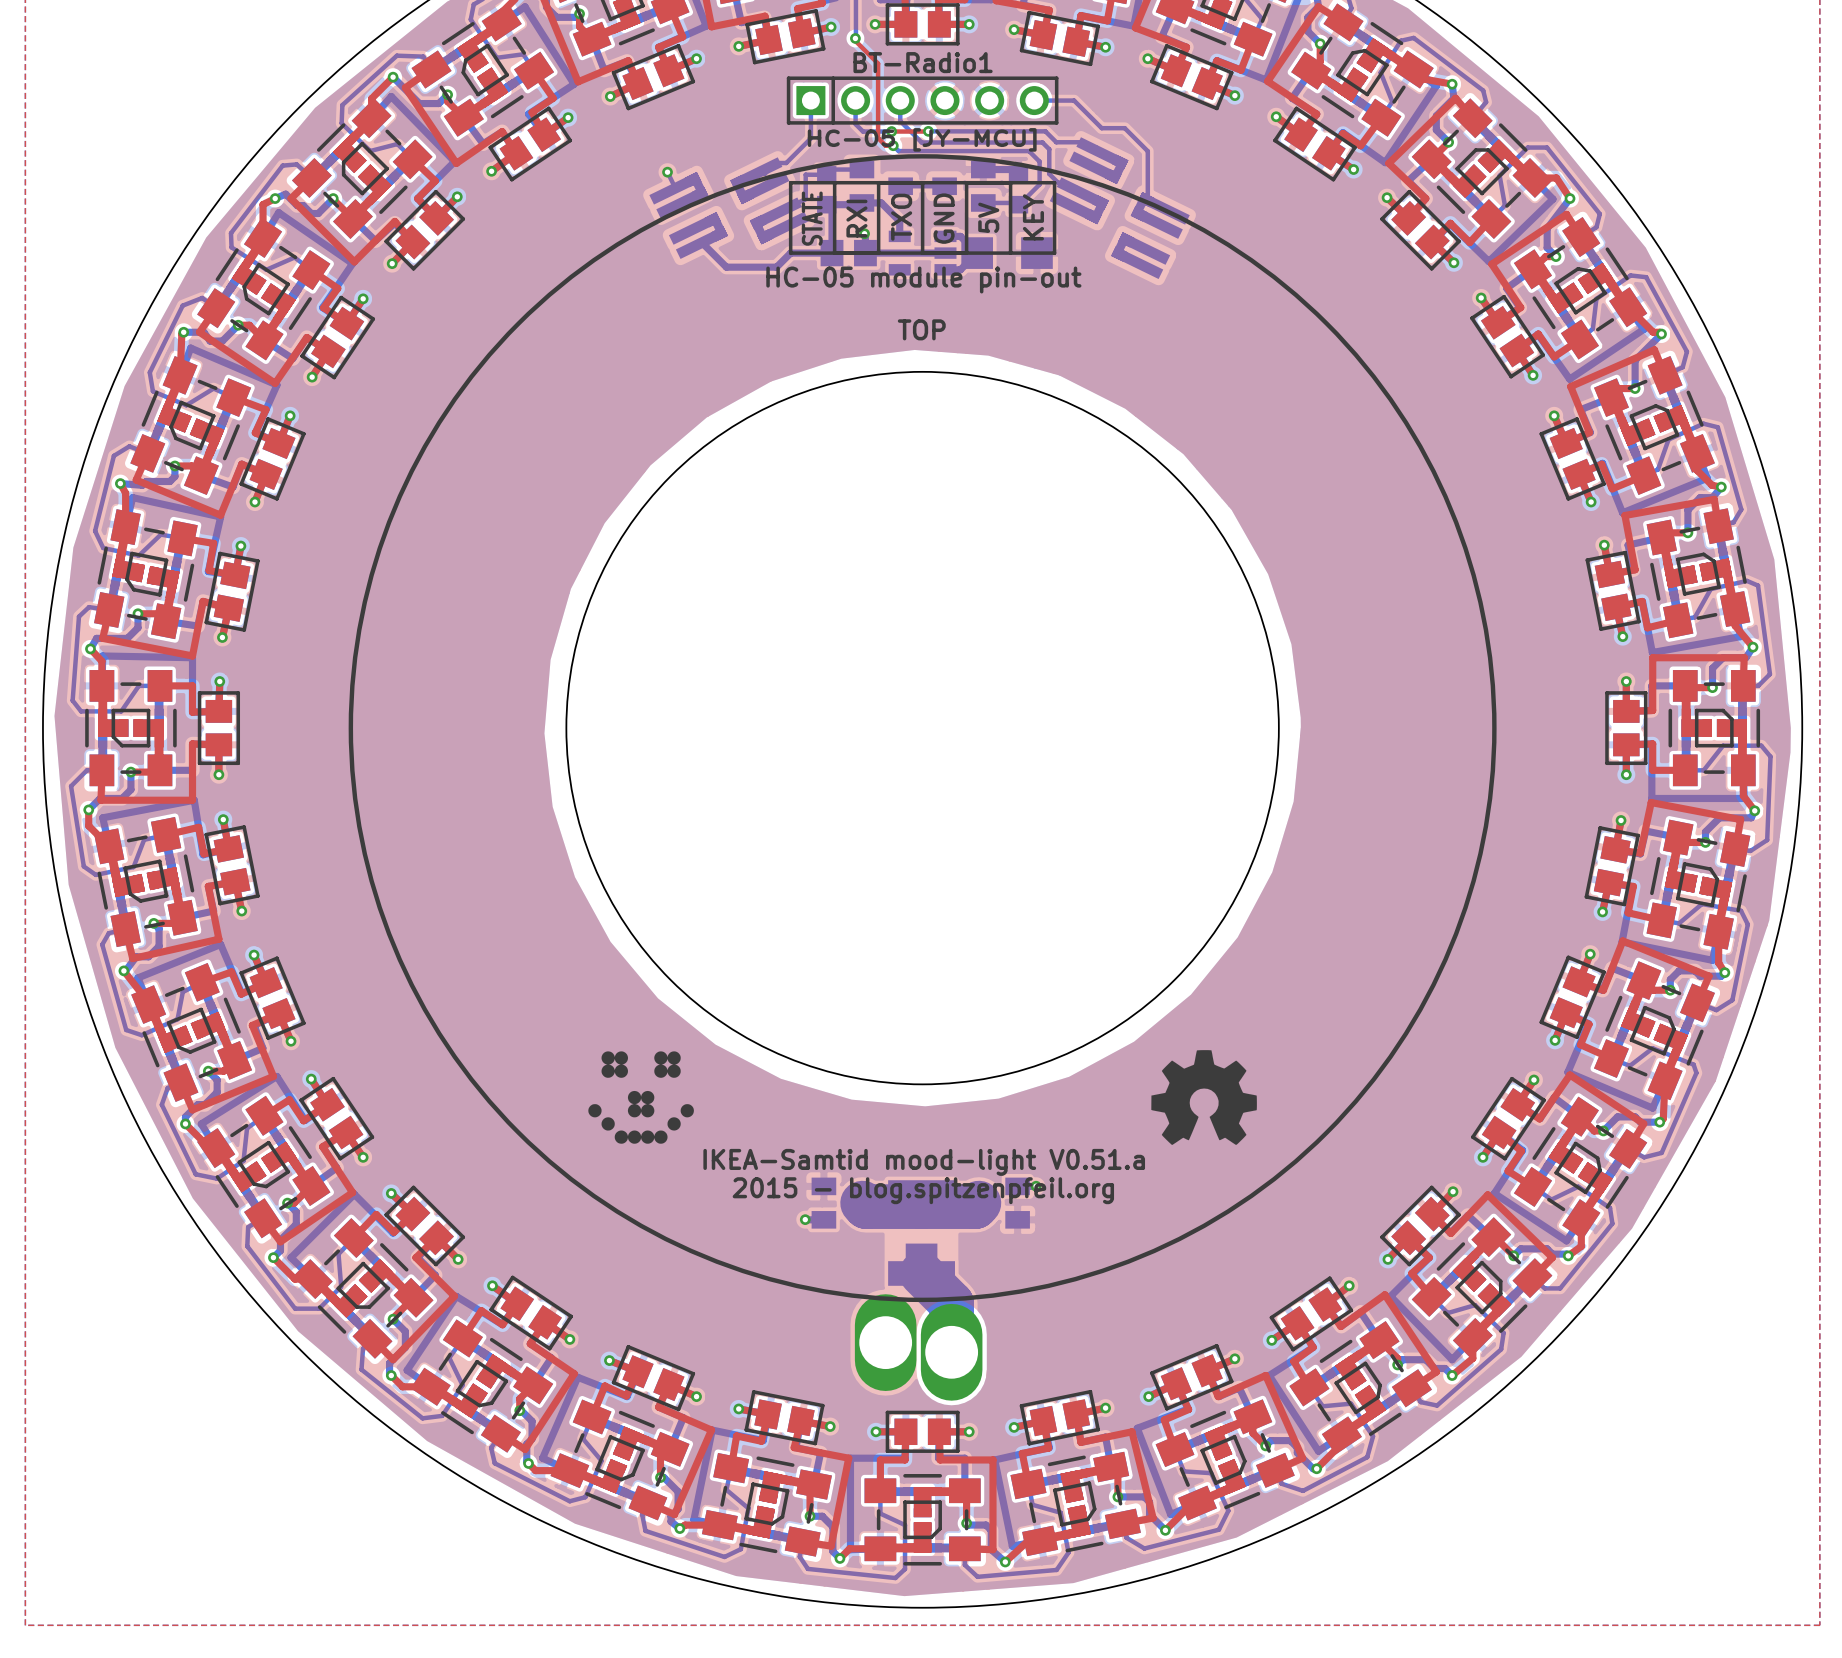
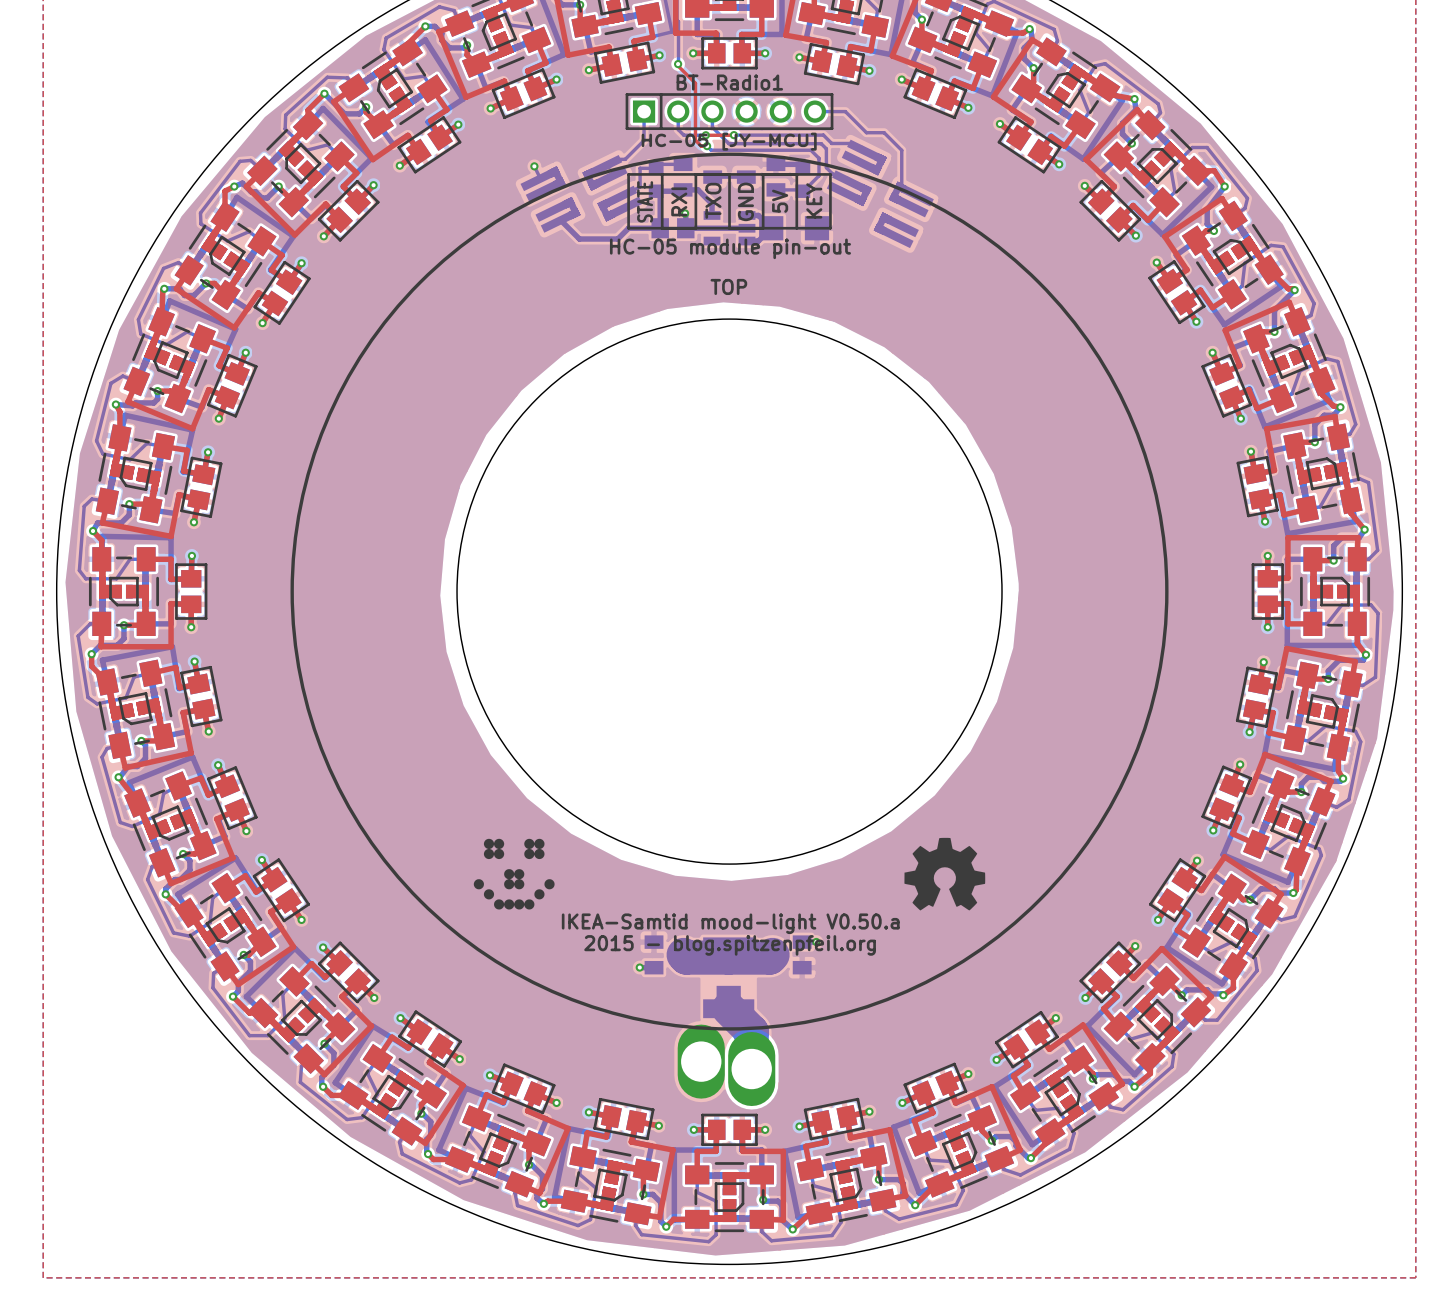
text: IKEA-Samtid mood-light V0.51.a (924, 1162) -> IKEA-Samtid mood-light V0.50.a (730, 923)

